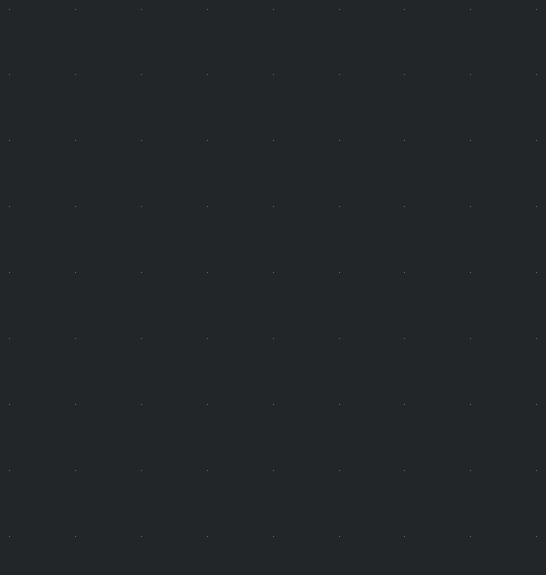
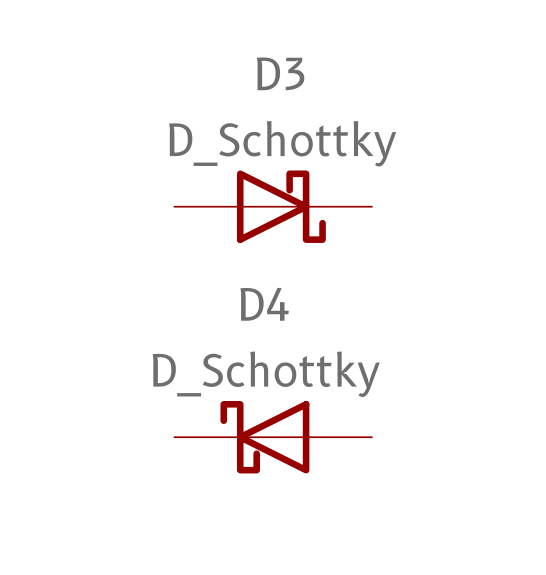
D3: none -> D_Schottky (273, 206)
D4: none -> D_Schottky (273, 437)

